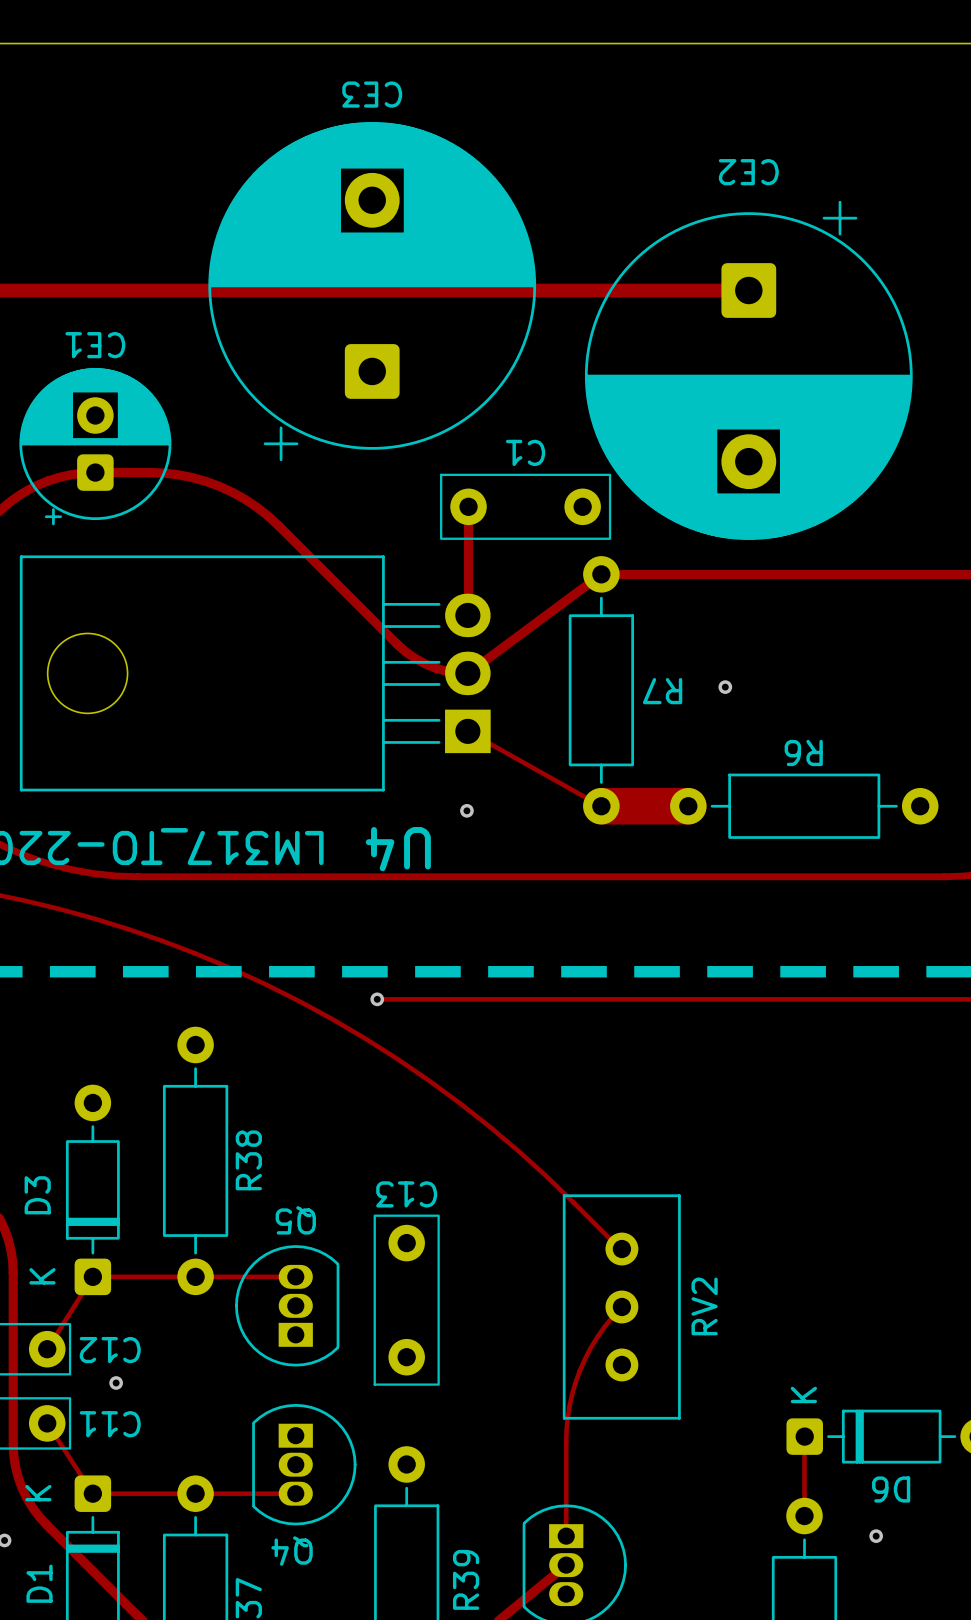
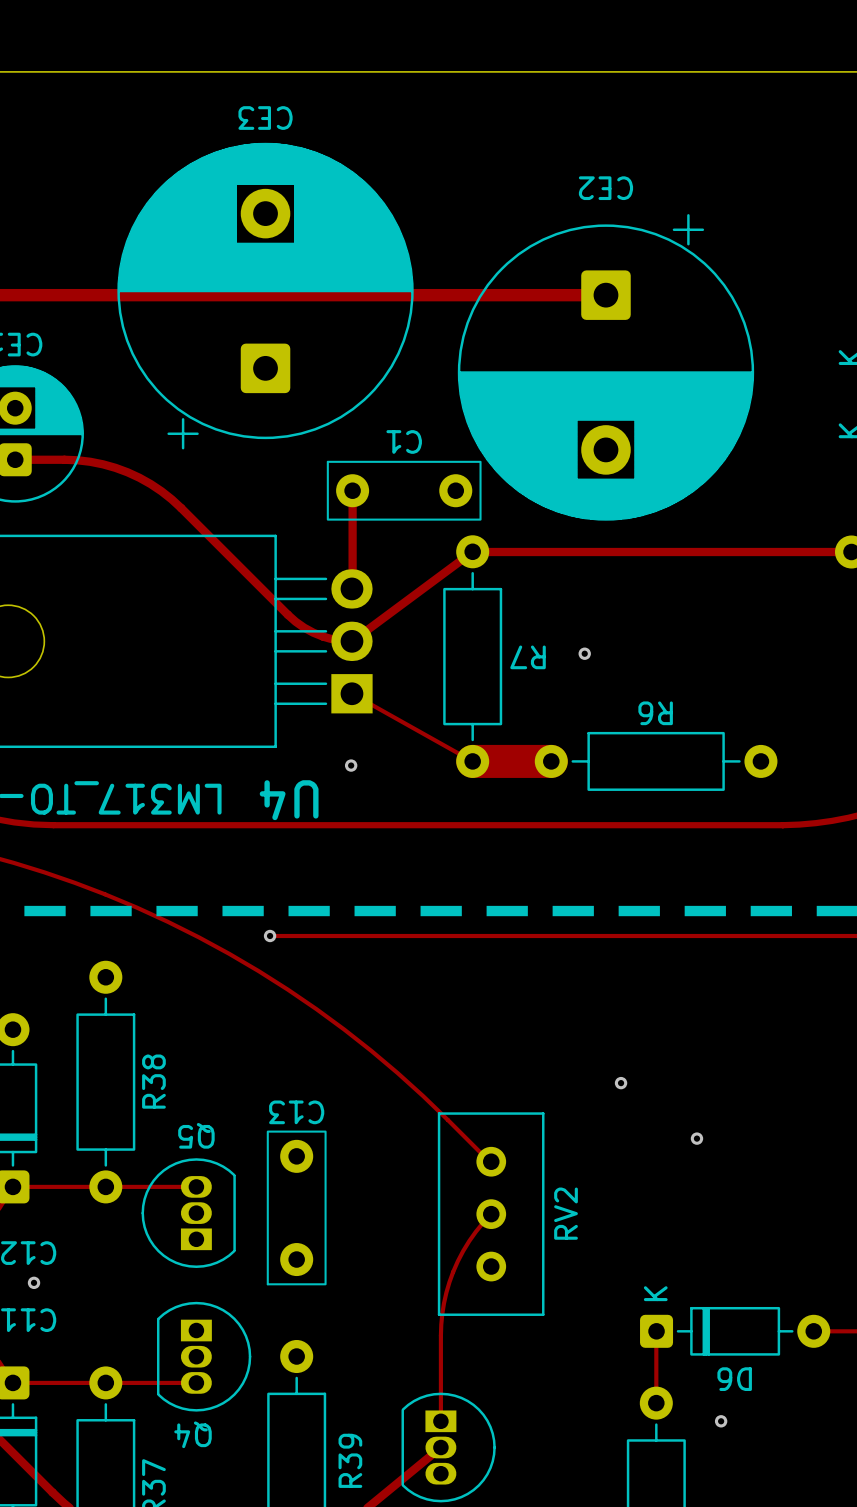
via: none -> (621, 1083)
via: none -> (696, 1138)

